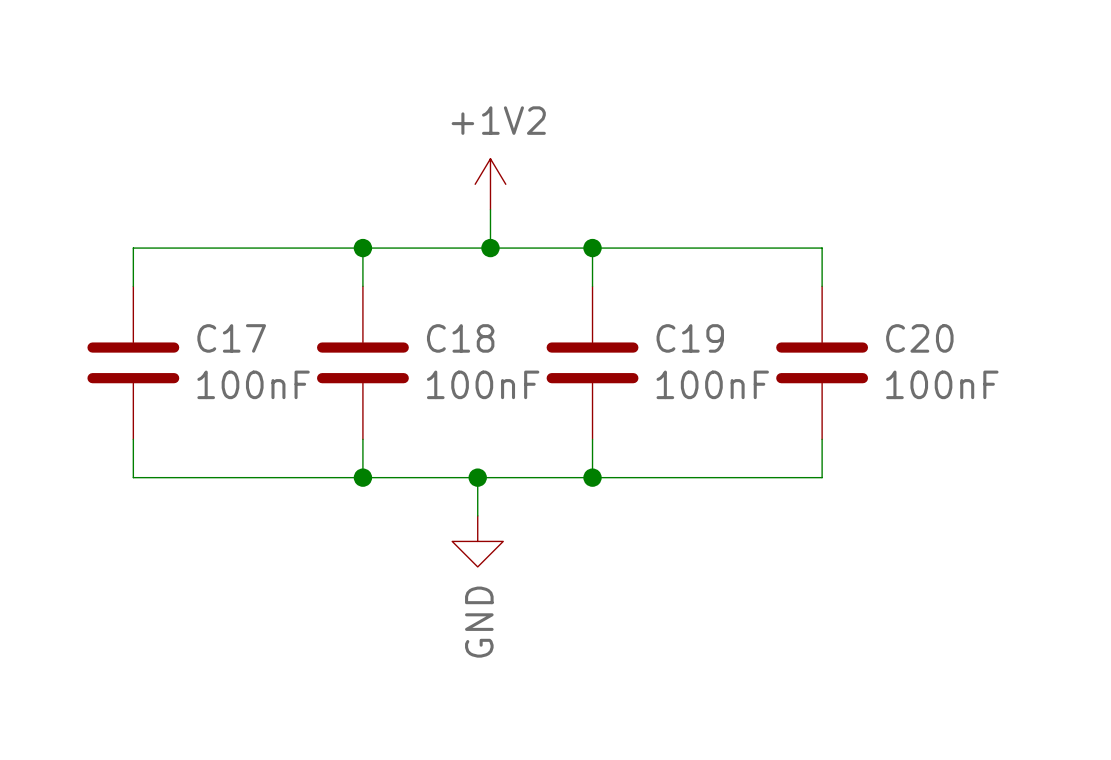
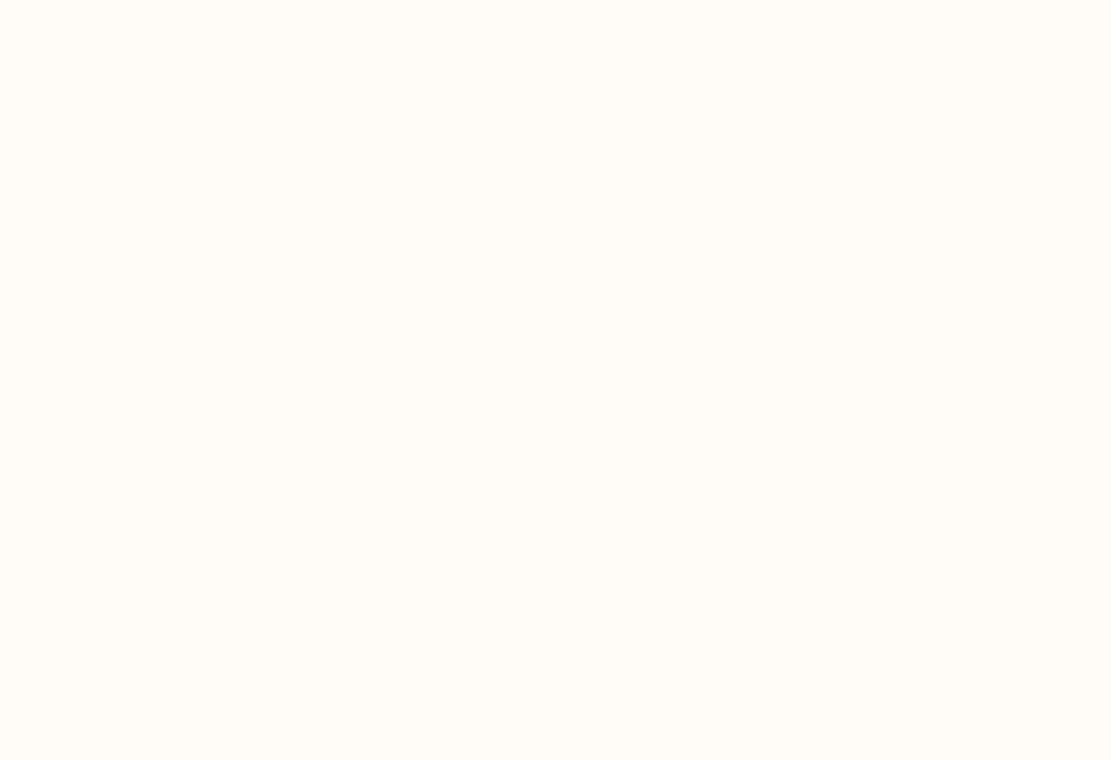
power symbol: +1V2 (490, 184) -> none
wire: (490, 209) (490, 248) -> none
wire: (362, 248) (362, 286) -> none
junction: (362, 248) -> none
junction: (490, 248) -> none
wire: (592, 248) (592, 286) -> none
junction: (592, 248) -> none
wire: (133, 286) (133, 248) (822, 248) (822, 286) -> none
C17: 100nF (133, 362) -> none
C18: 100nF (362, 362) -> none
C19: 100nF (592, 362) -> none
C20: 100nF (822, 362) -> none
wire: (133, 439) (133, 477) (822, 477) (822, 439) -> none
wire: (362, 439) (362, 477) -> none
wire: (592, 439) (592, 477) -> none
junction: (362, 477) -> none
wire: (477, 477) (477, 515) -> none
junction: (477, 477) -> none
junction: (592, 477) -> none
power symbol: GND (477, 541) -> none

